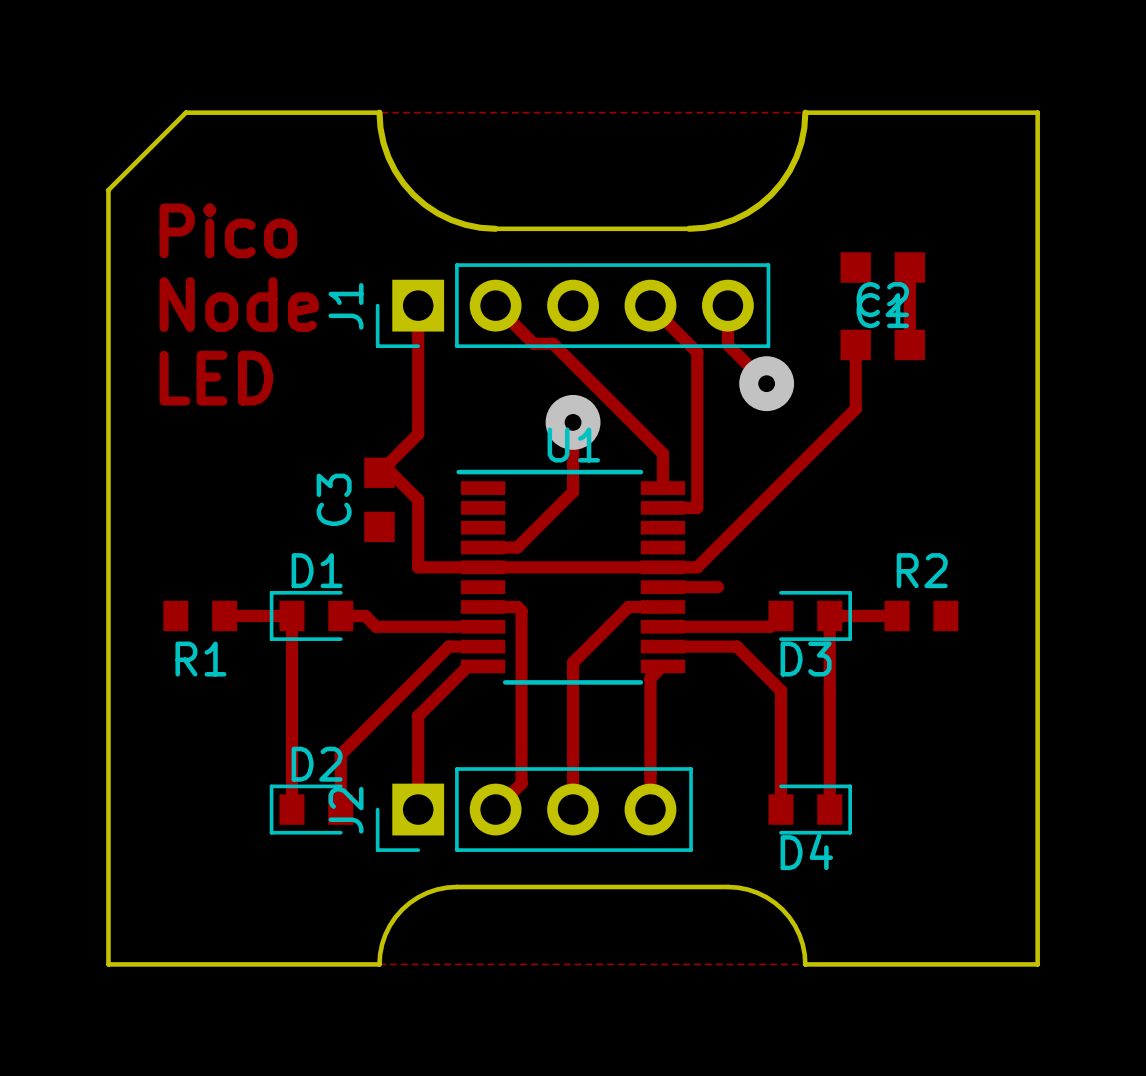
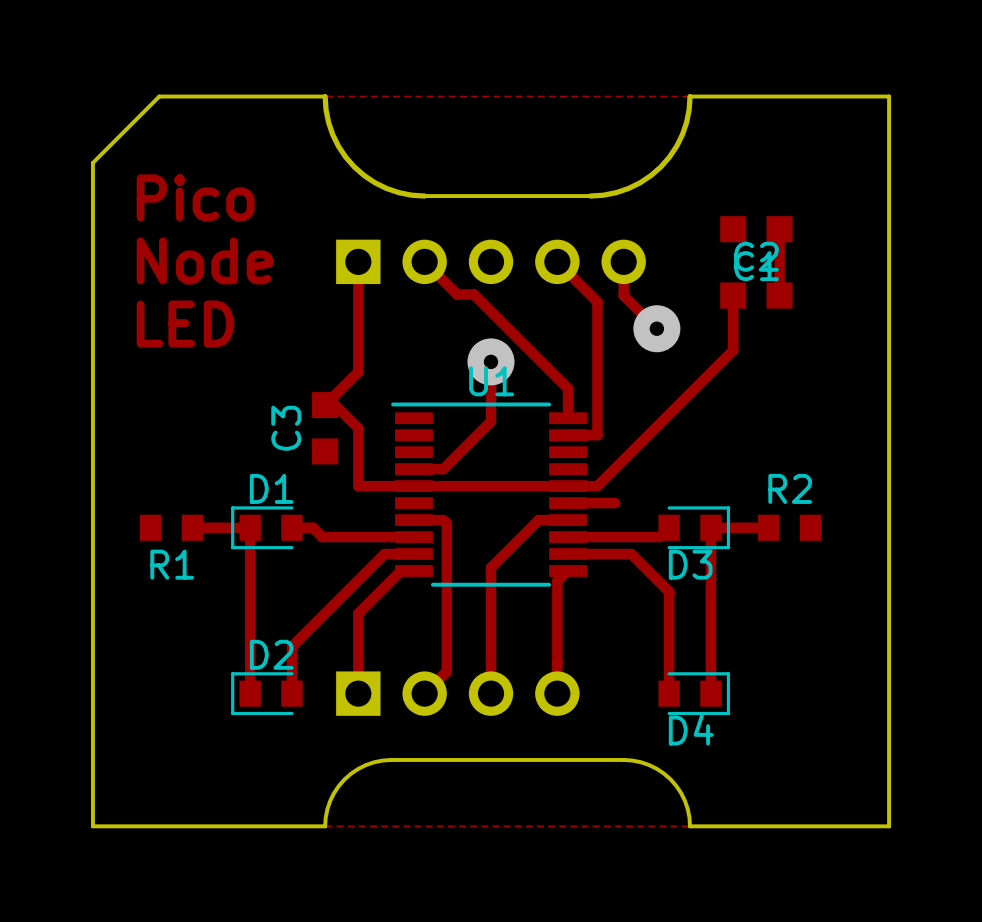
J1 side: top (573, 305) -> bottom (491, 261)
J2 side: top (534, 809) -> bottom (457, 693)

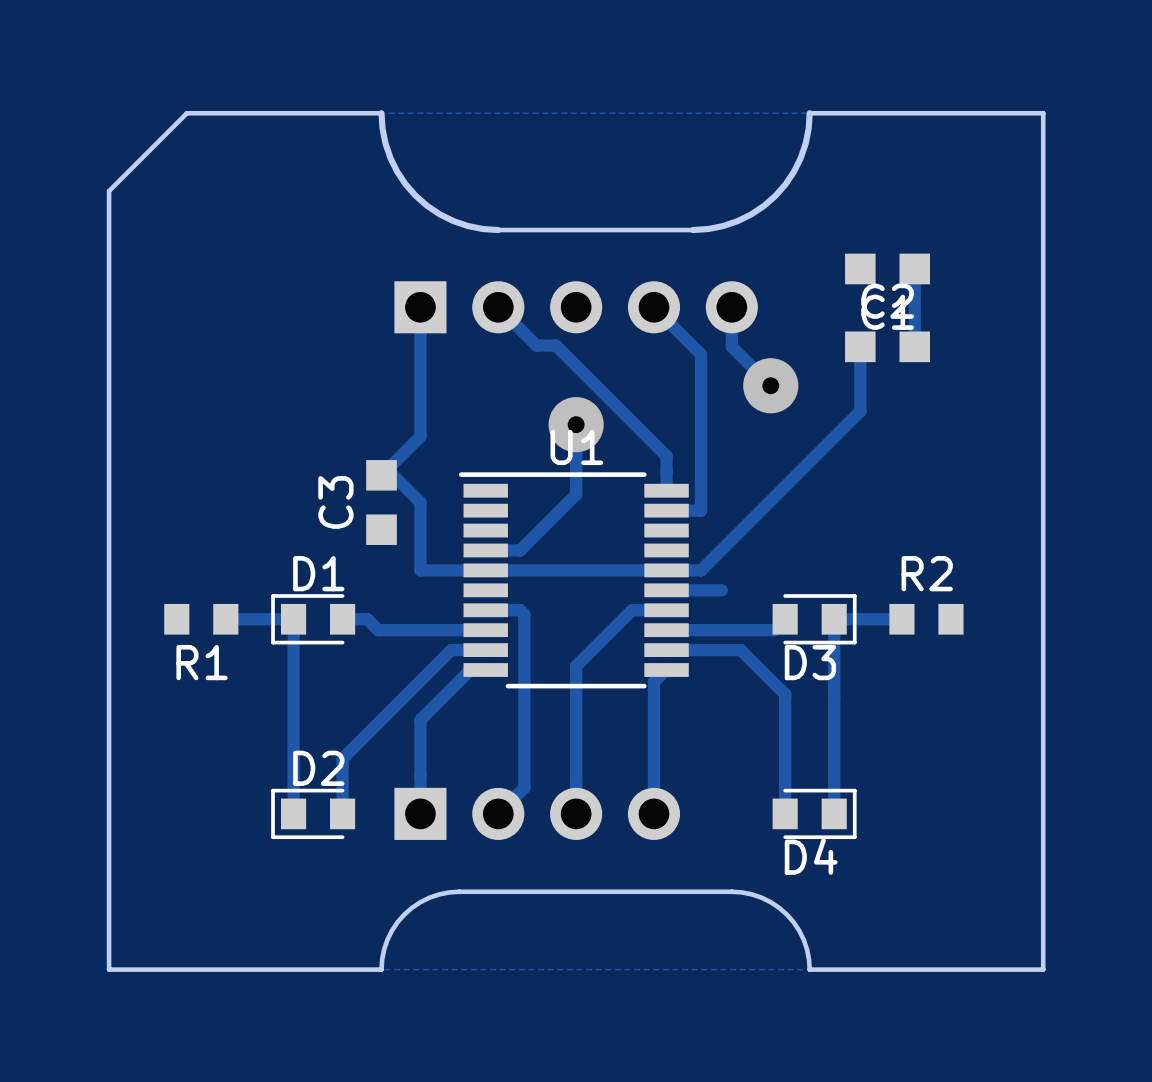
text: Pico (195, 197) -> none
text: Node (204, 260) -> none
text: LED (185, 324) -> none

